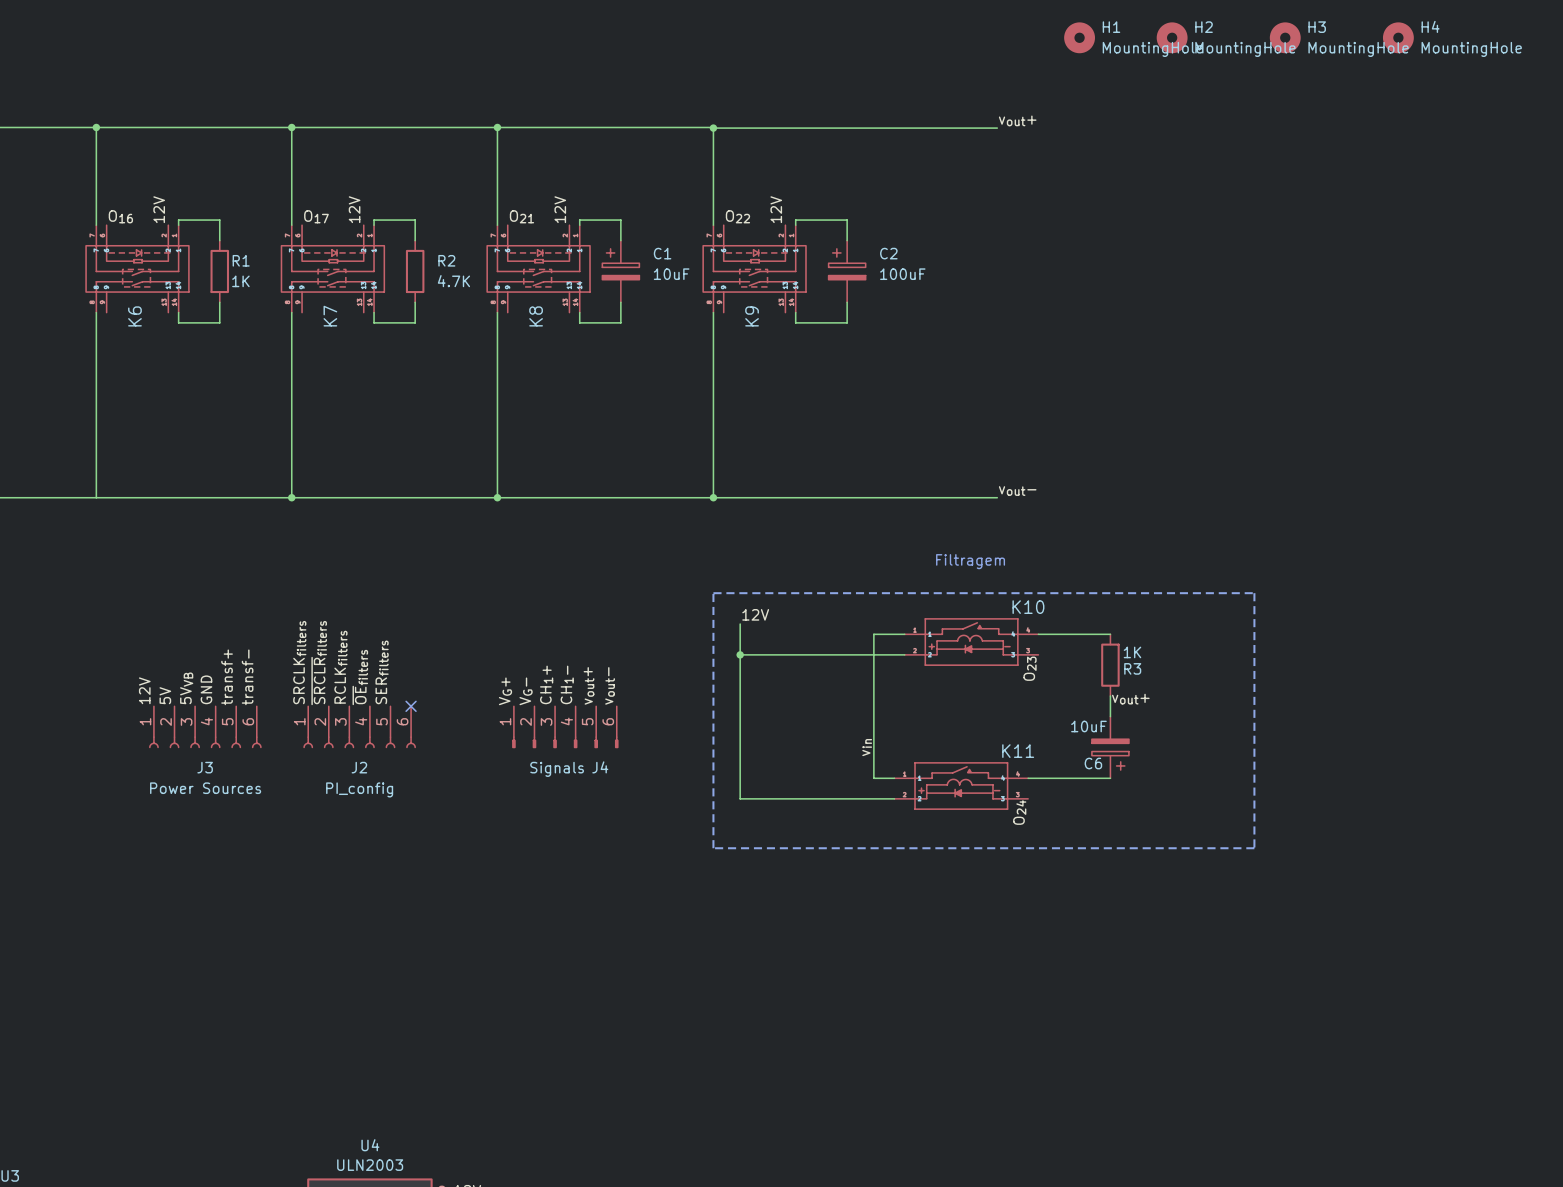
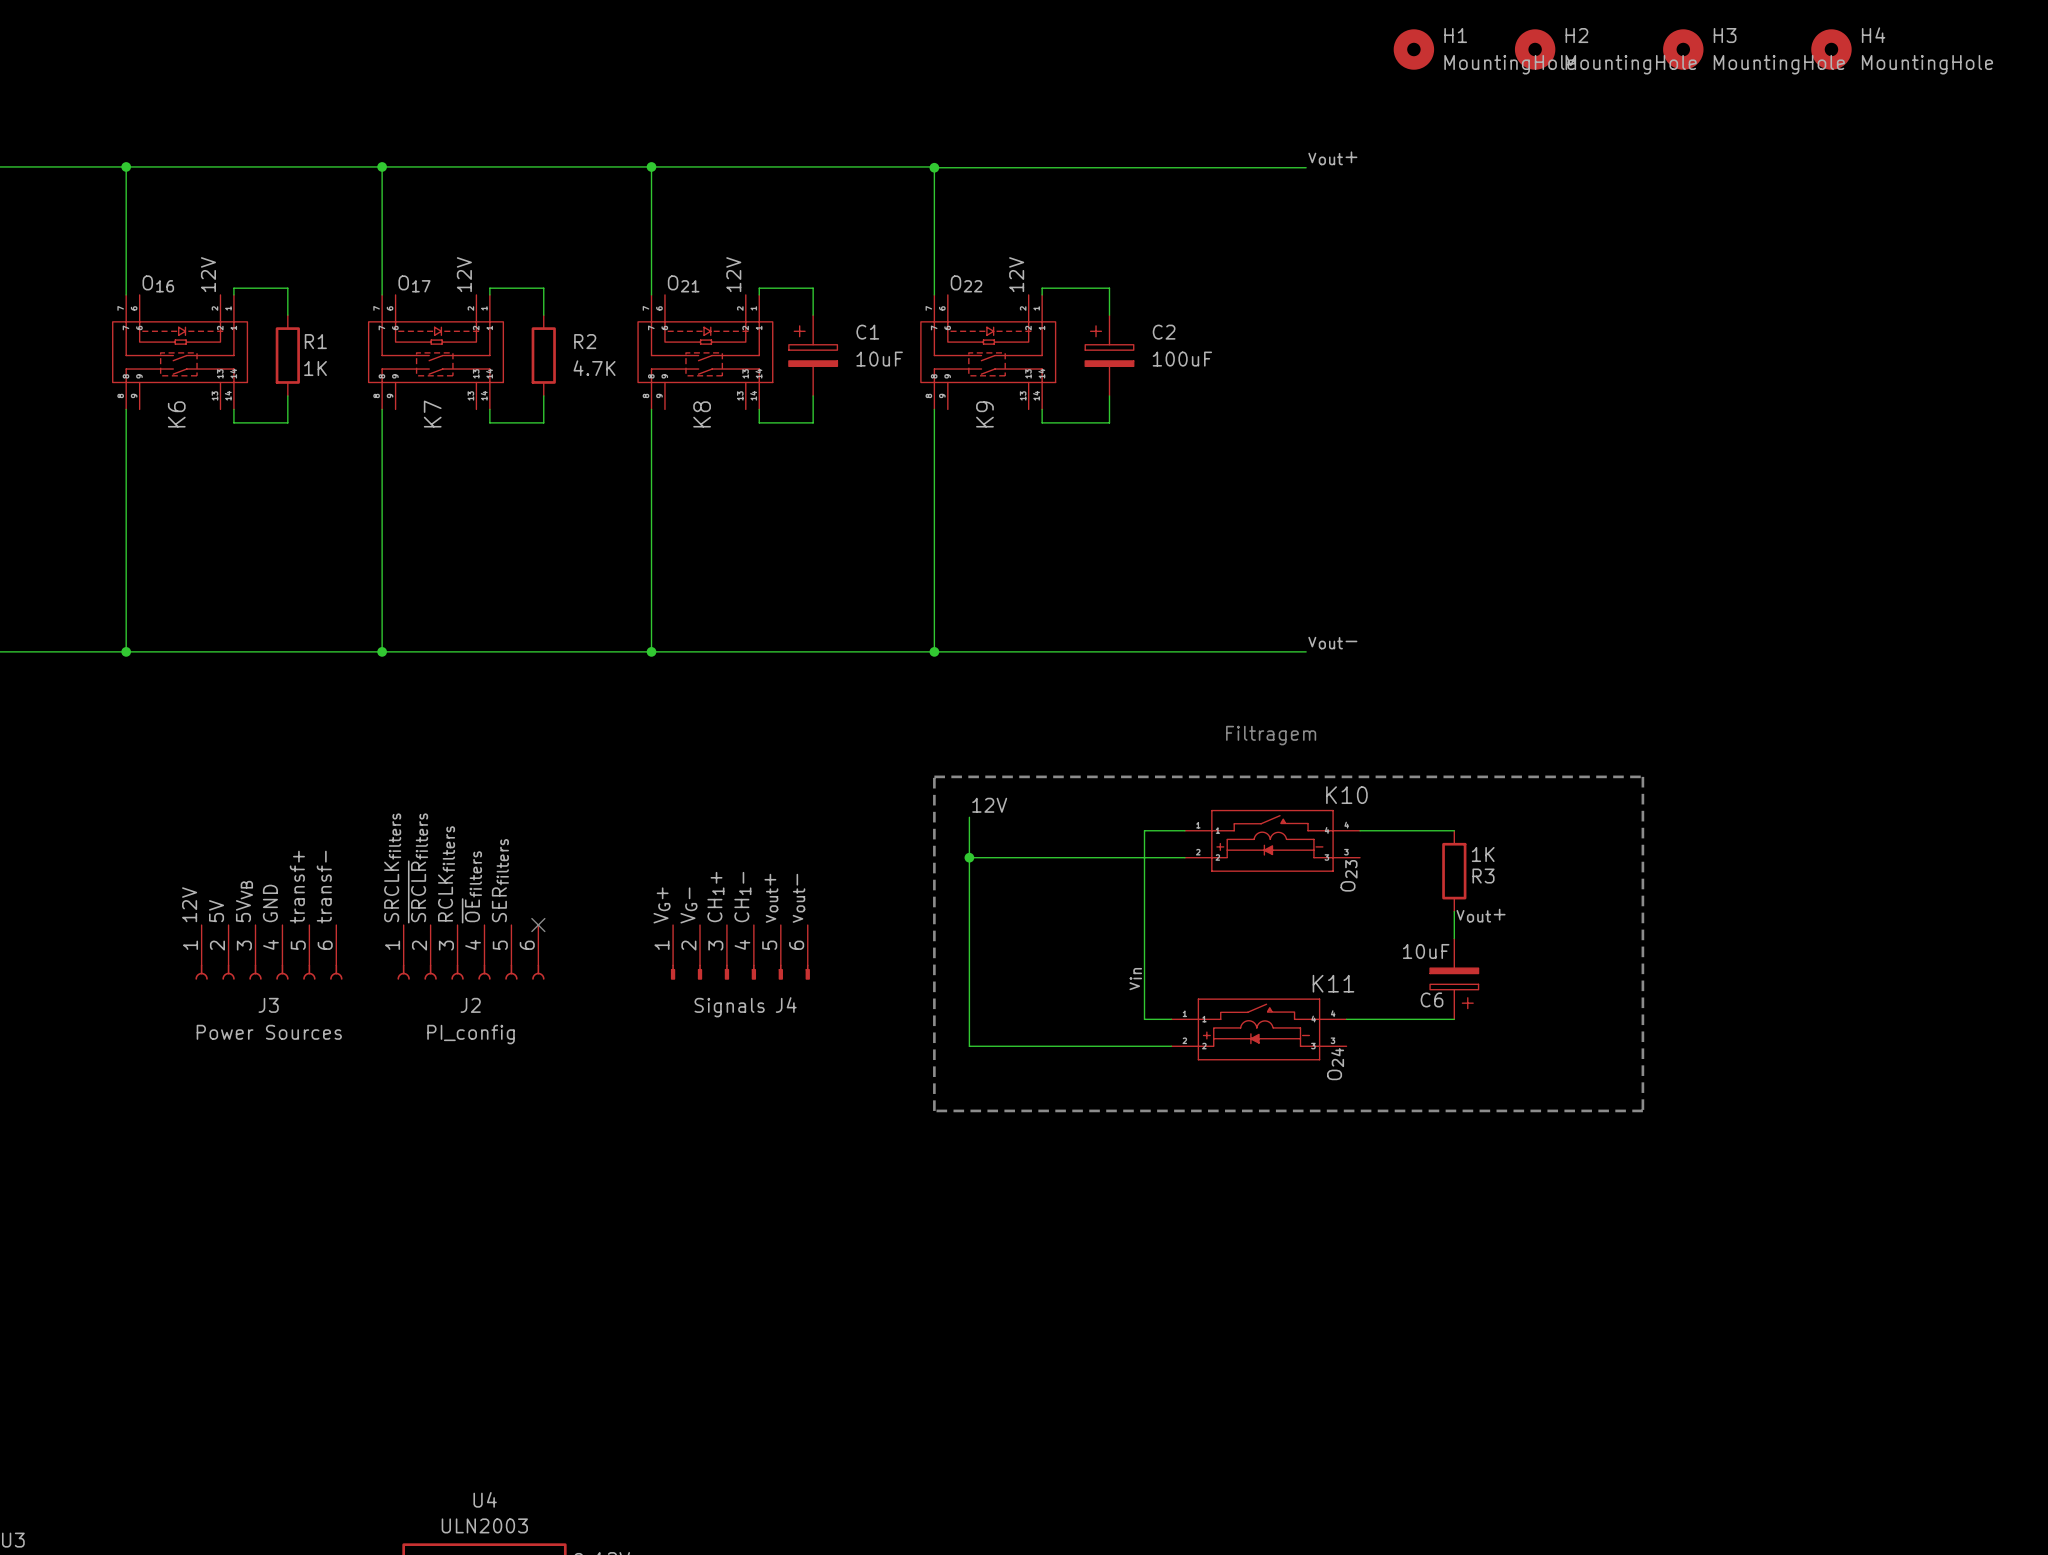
junction: none -> (126, 651)

